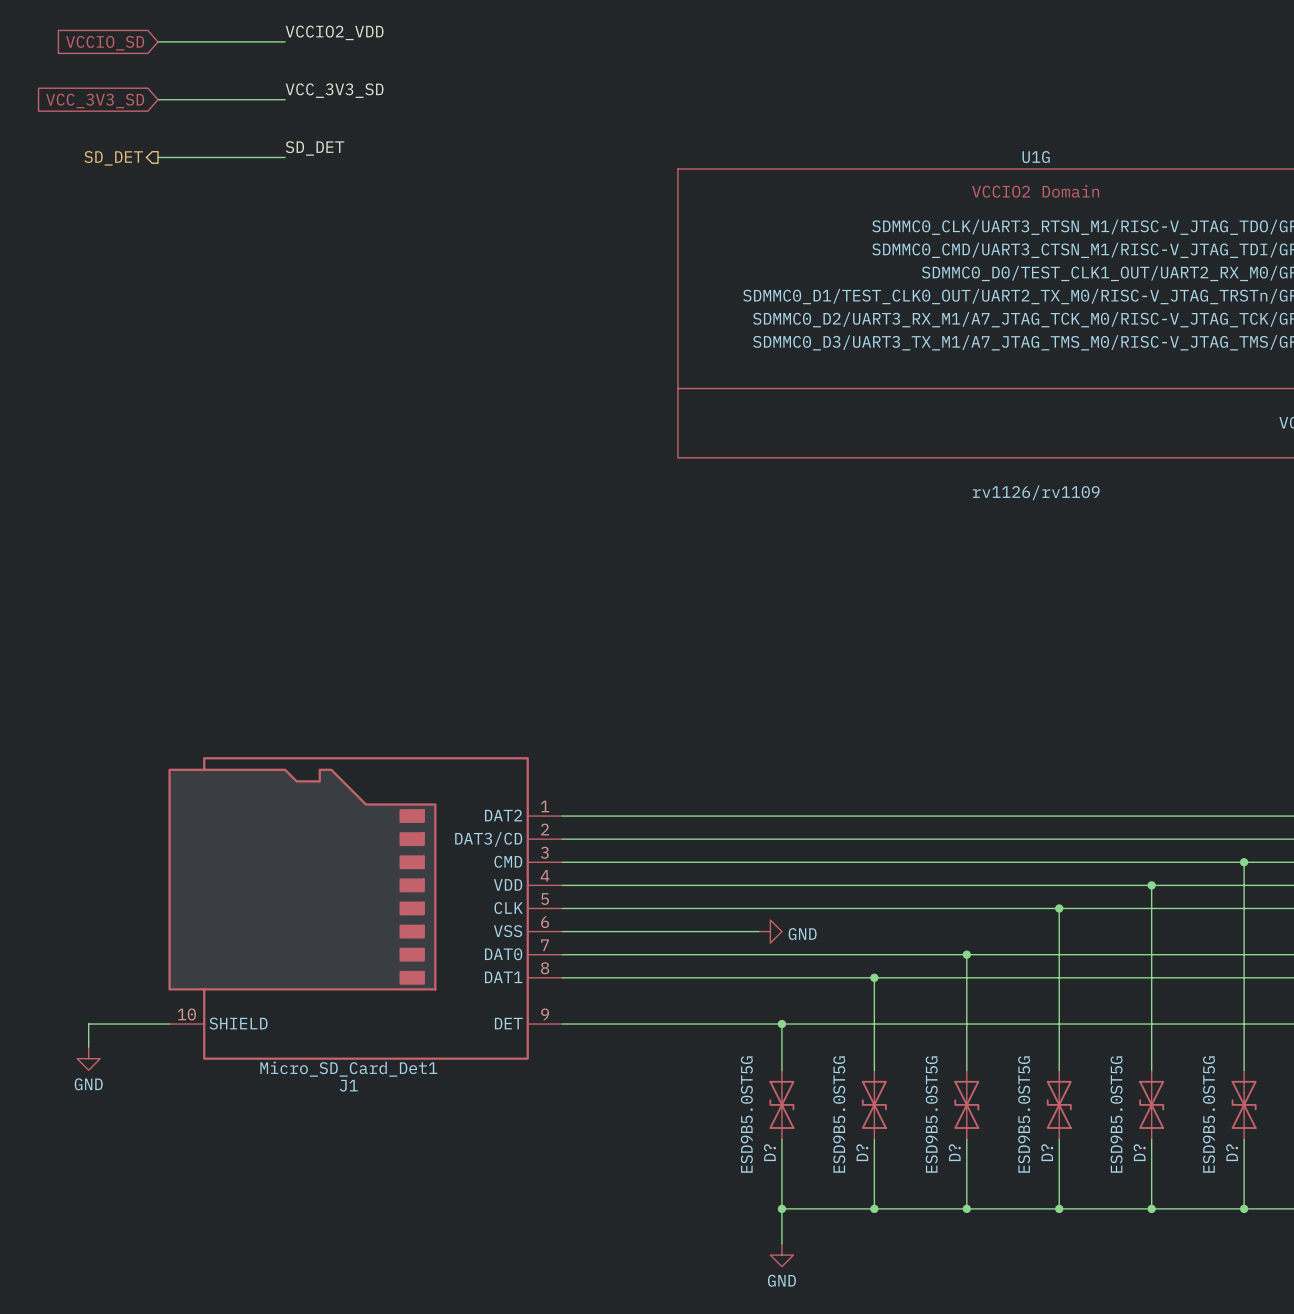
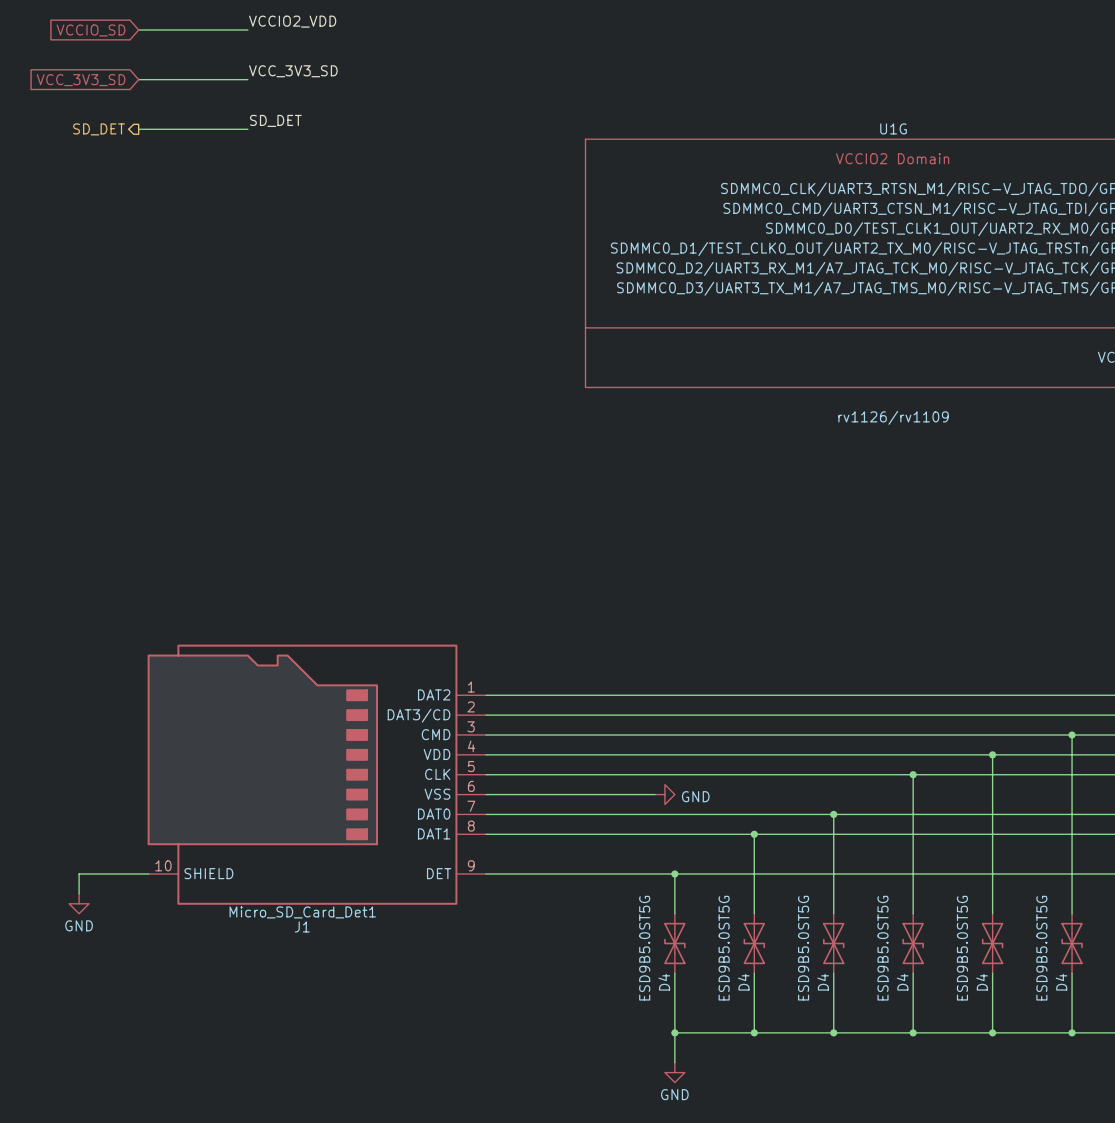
D? name: D? (769, 1152) -> D4 (664, 982)
D? name: D? (862, 1152) -> D4 (743, 982)
D? name: D? (954, 1152) -> D4 (823, 982)
D? name: D? (1047, 1152) -> D4 (902, 982)
D? name: D? (1139, 1152) -> D4 (982, 982)
D? name: D? (1232, 1152) -> D4 (1061, 982)

